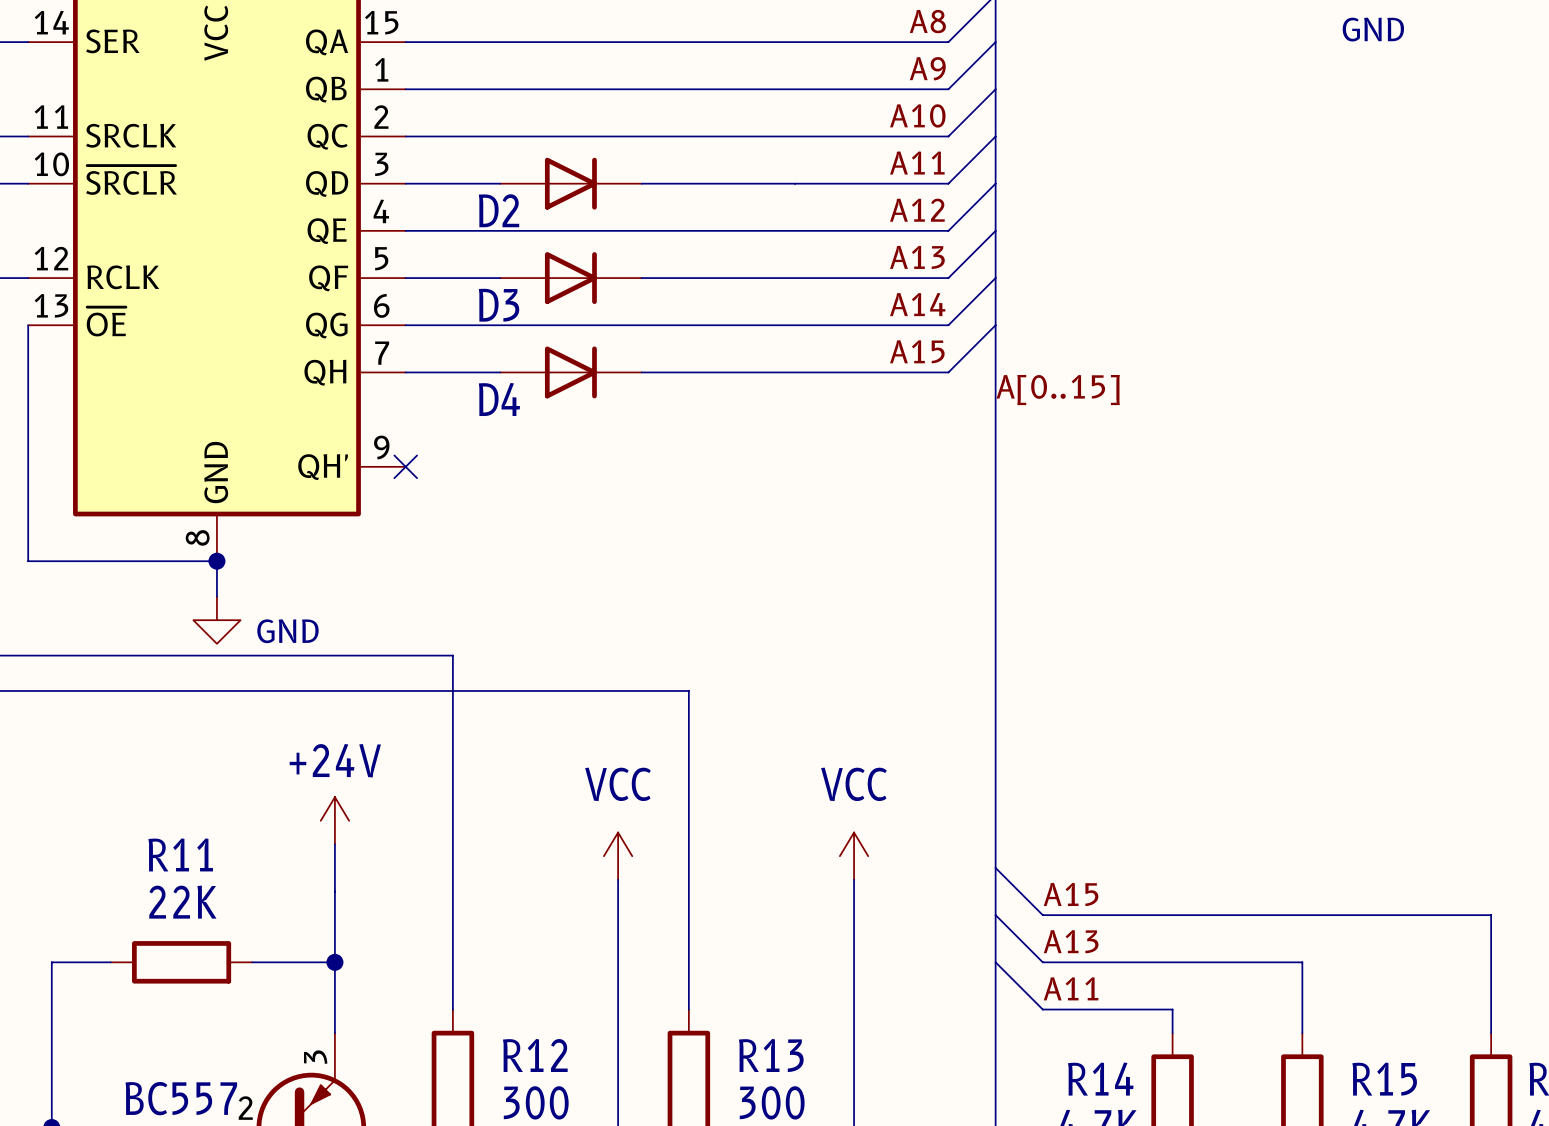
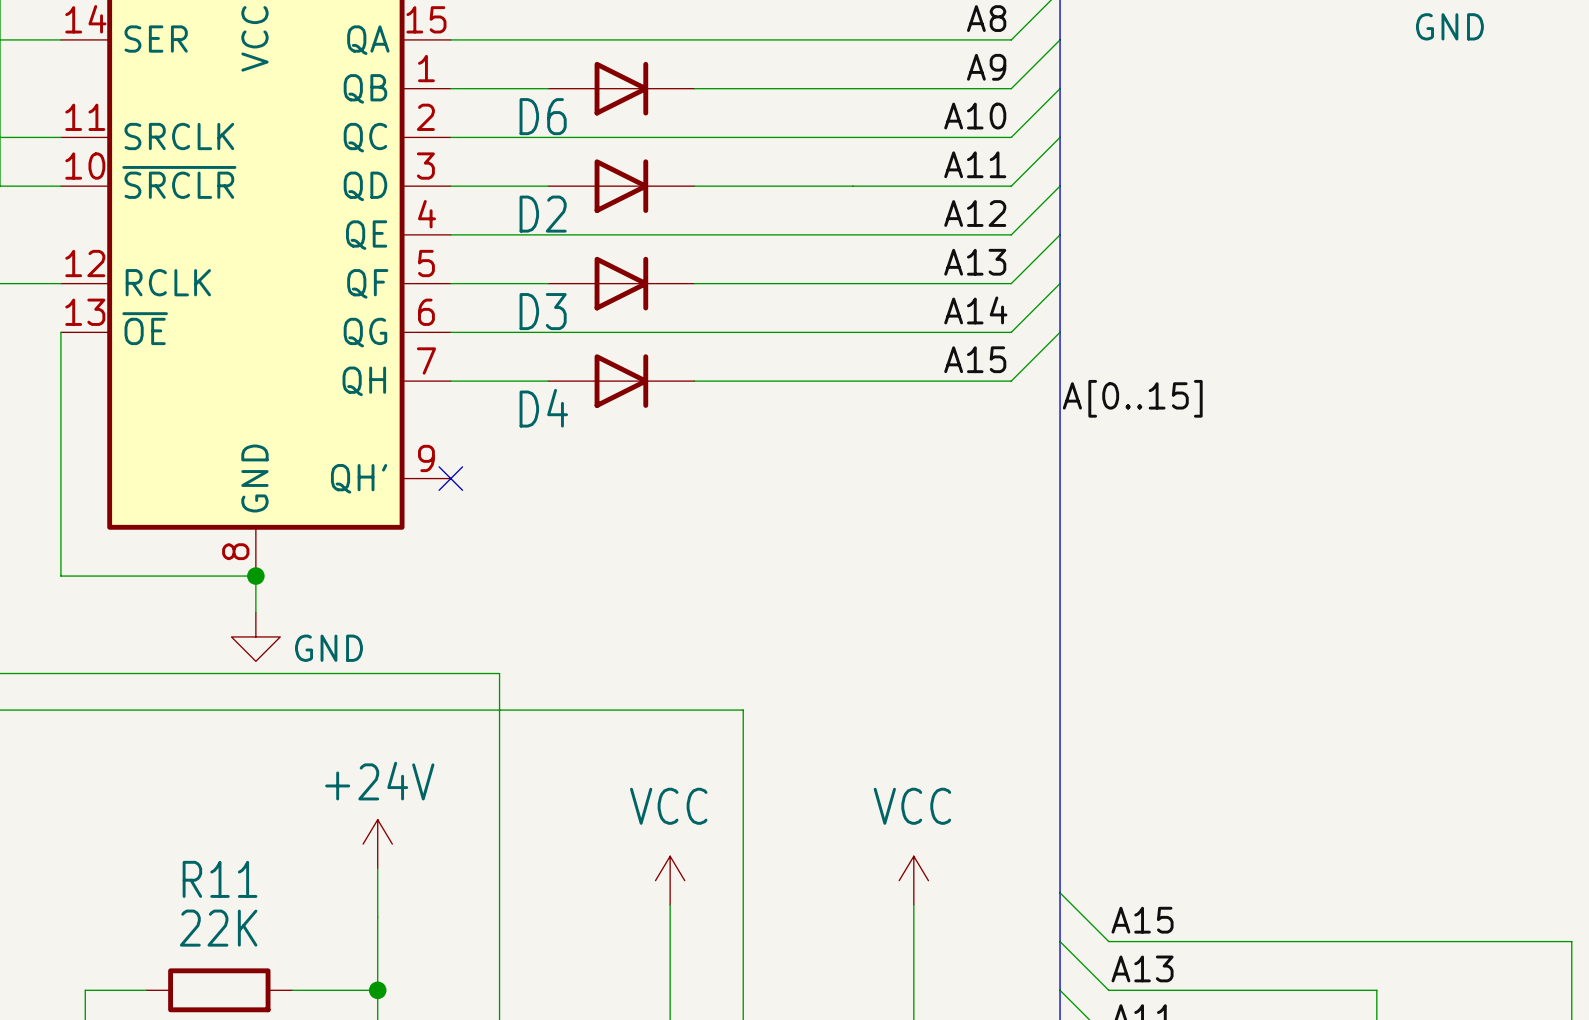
D6: none -> (621, 88)

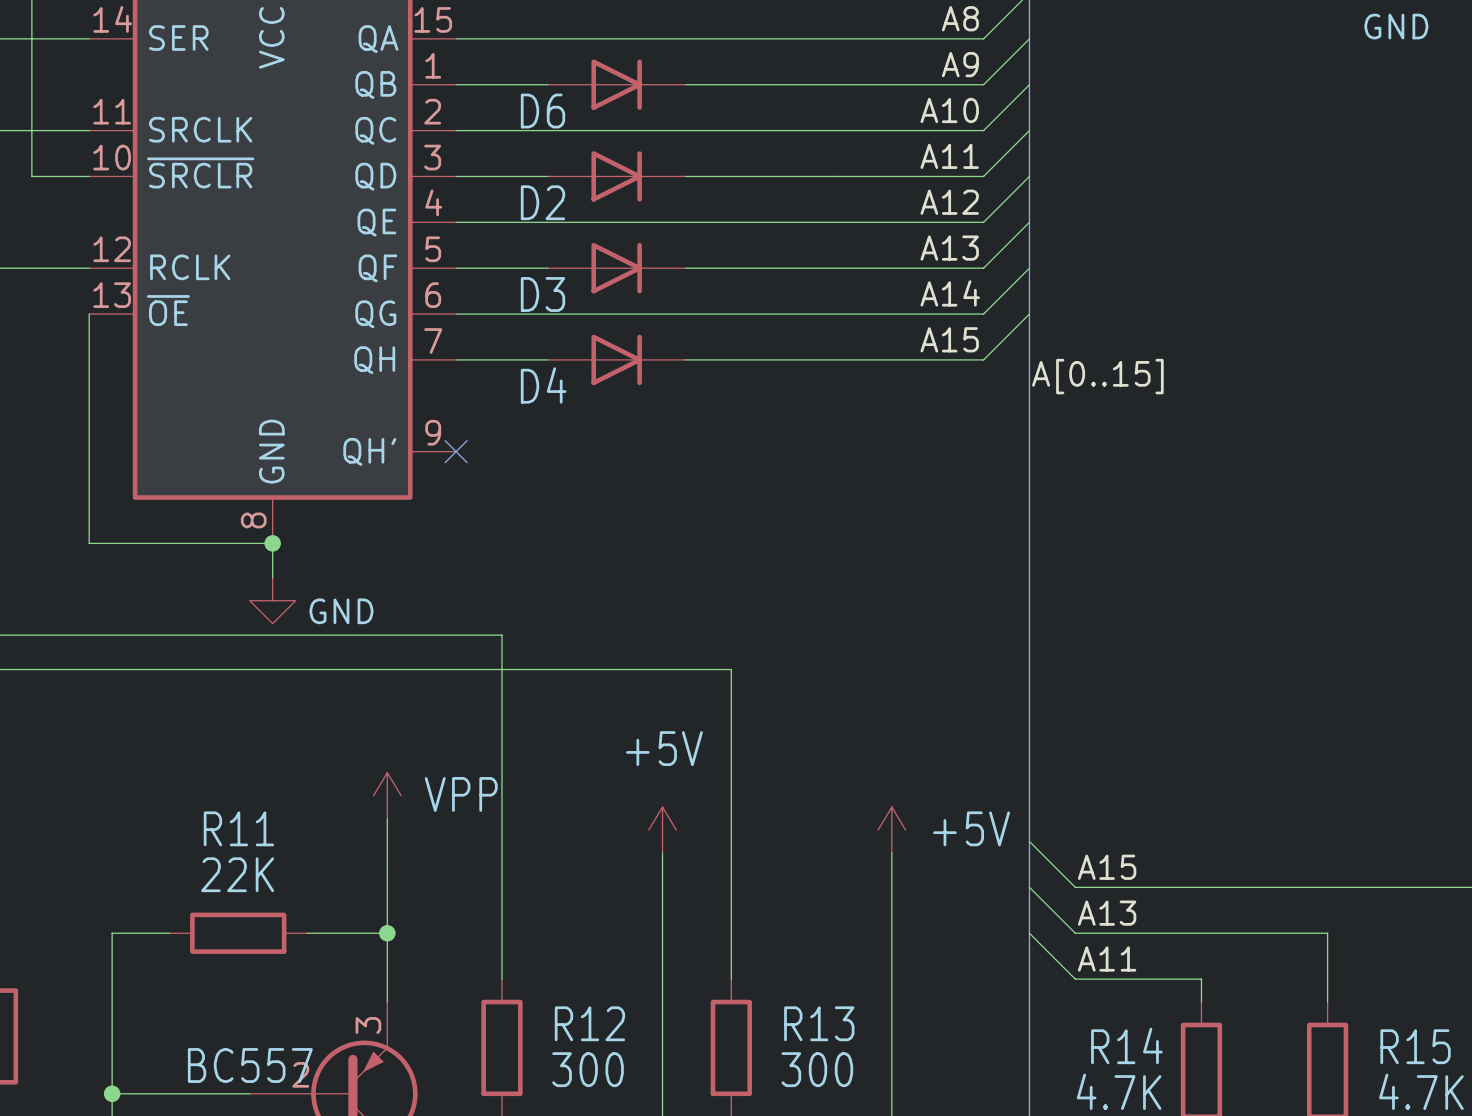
power symbol: +24V (377, 844) -> VPP (387, 795)
power symbol: VCC (670, 880) -> +5V (662, 830)
power symbol: VCC (913, 880) -> +5V (891, 830)

